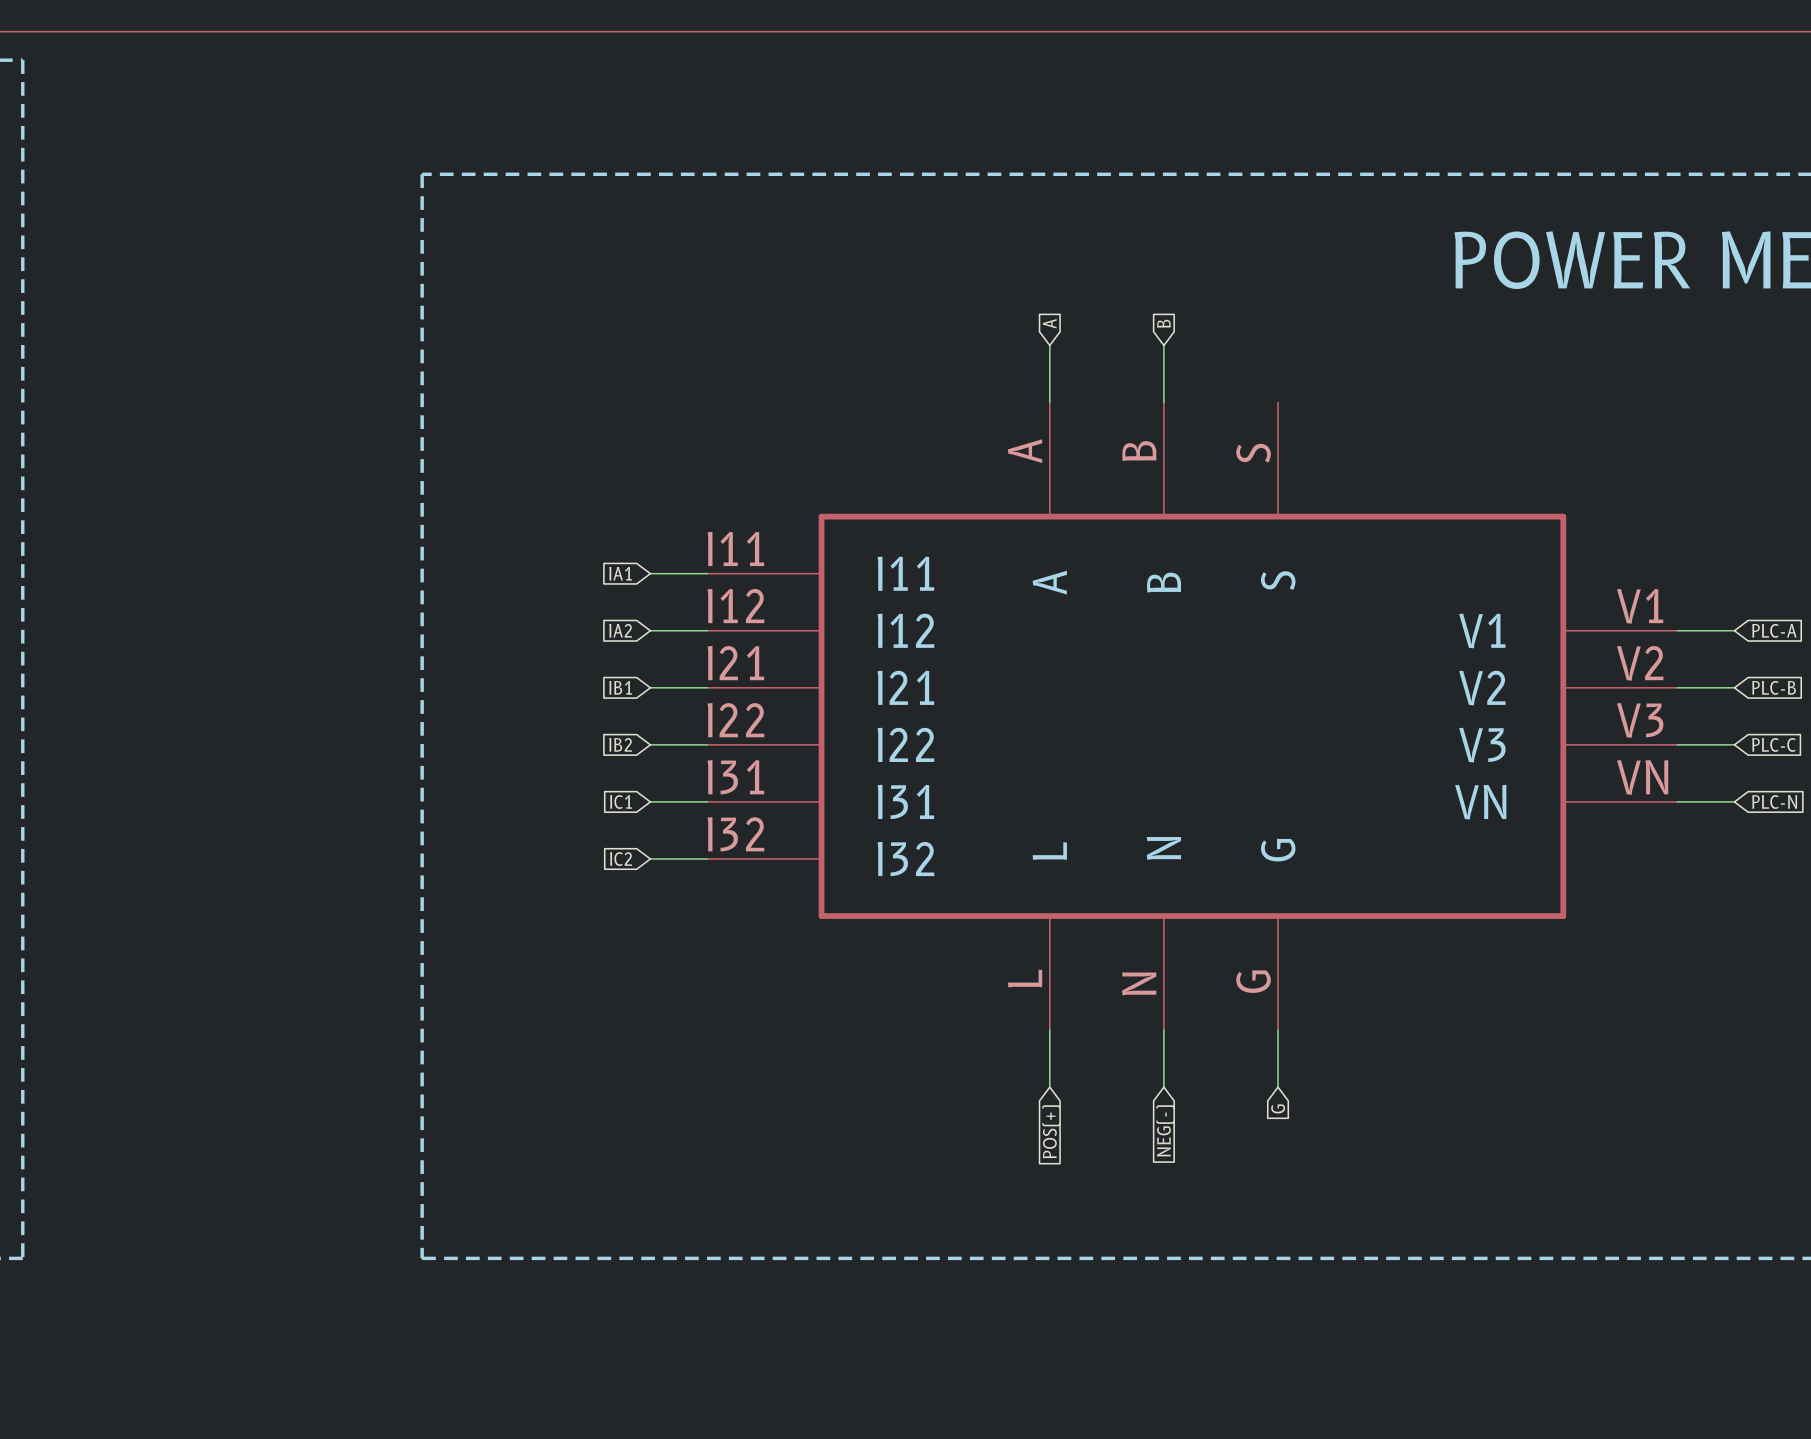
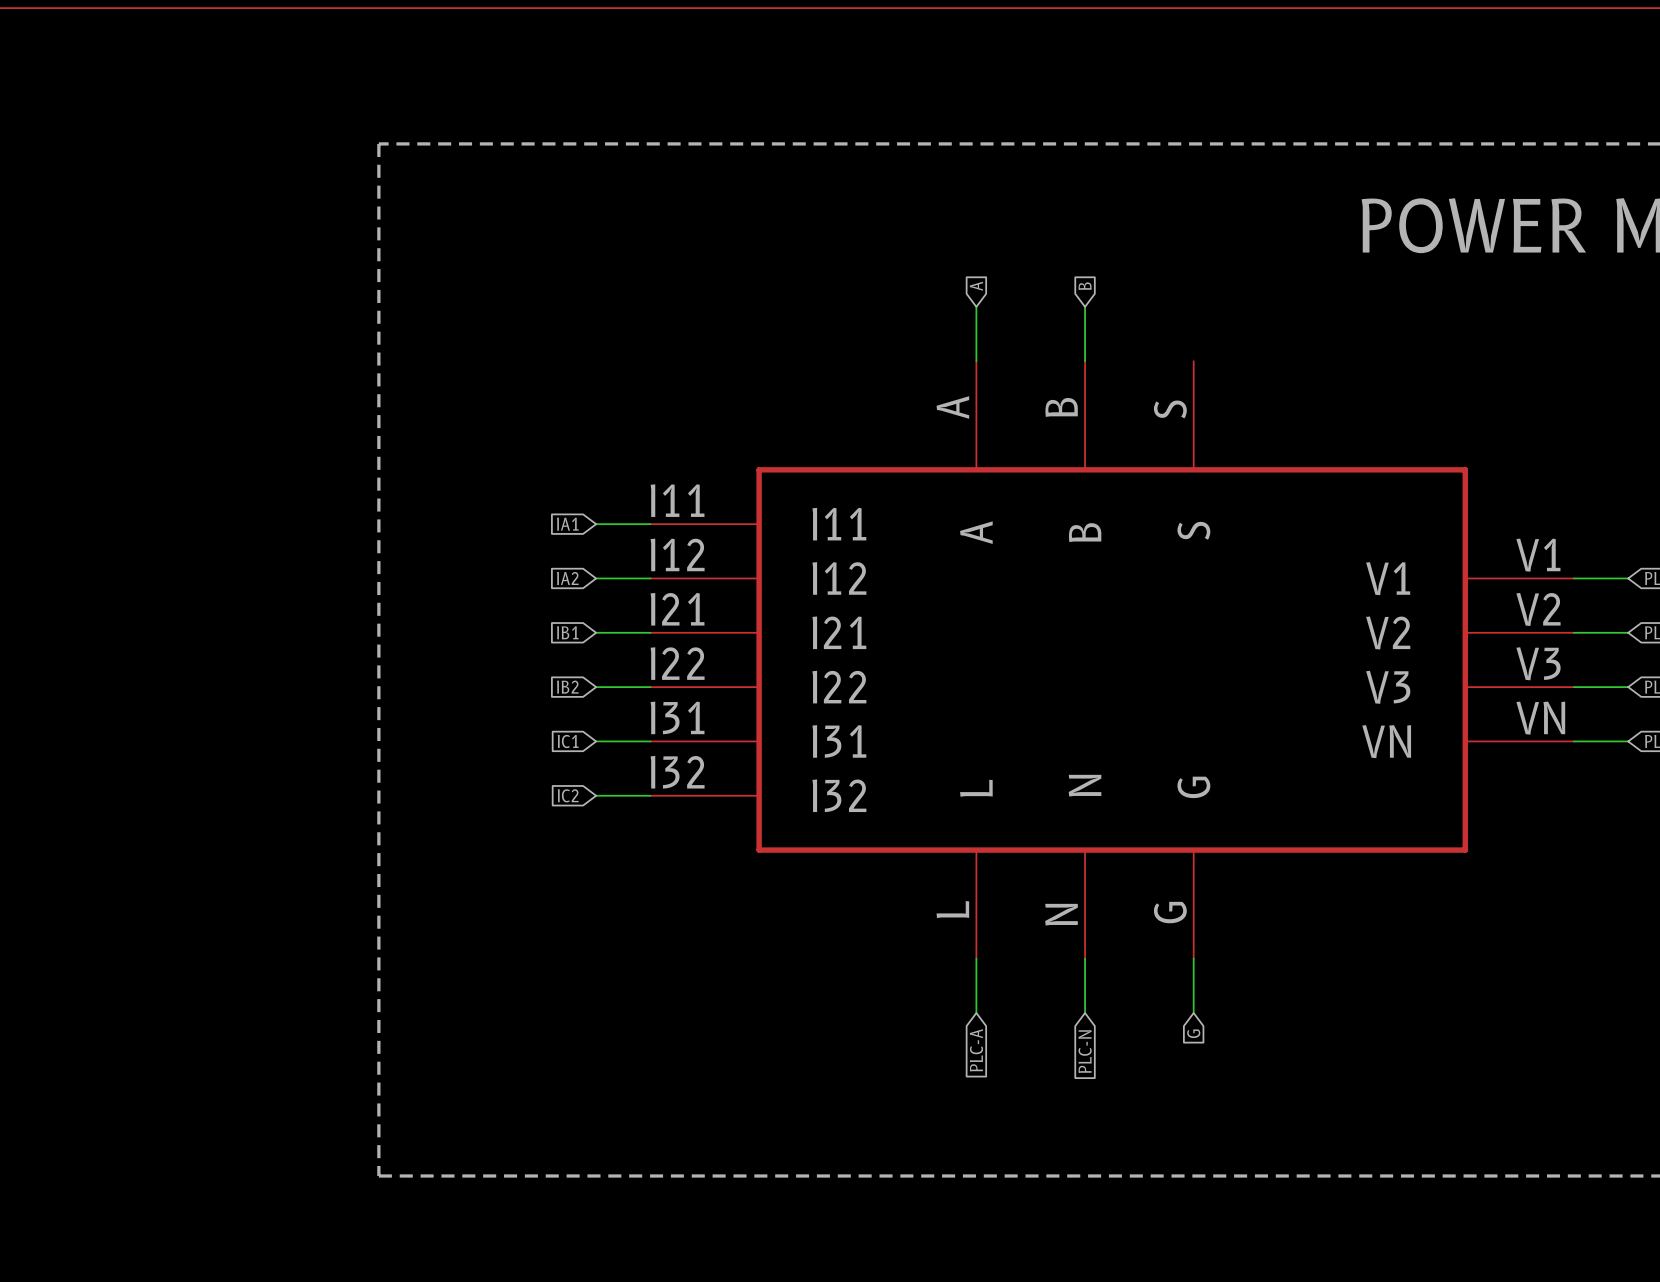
global label: NEG(-) (1165, 1130) -> PLC-N (1085, 1051)
global label: POS(+) (1051, 1131) -> PLC-A (976, 1050)

